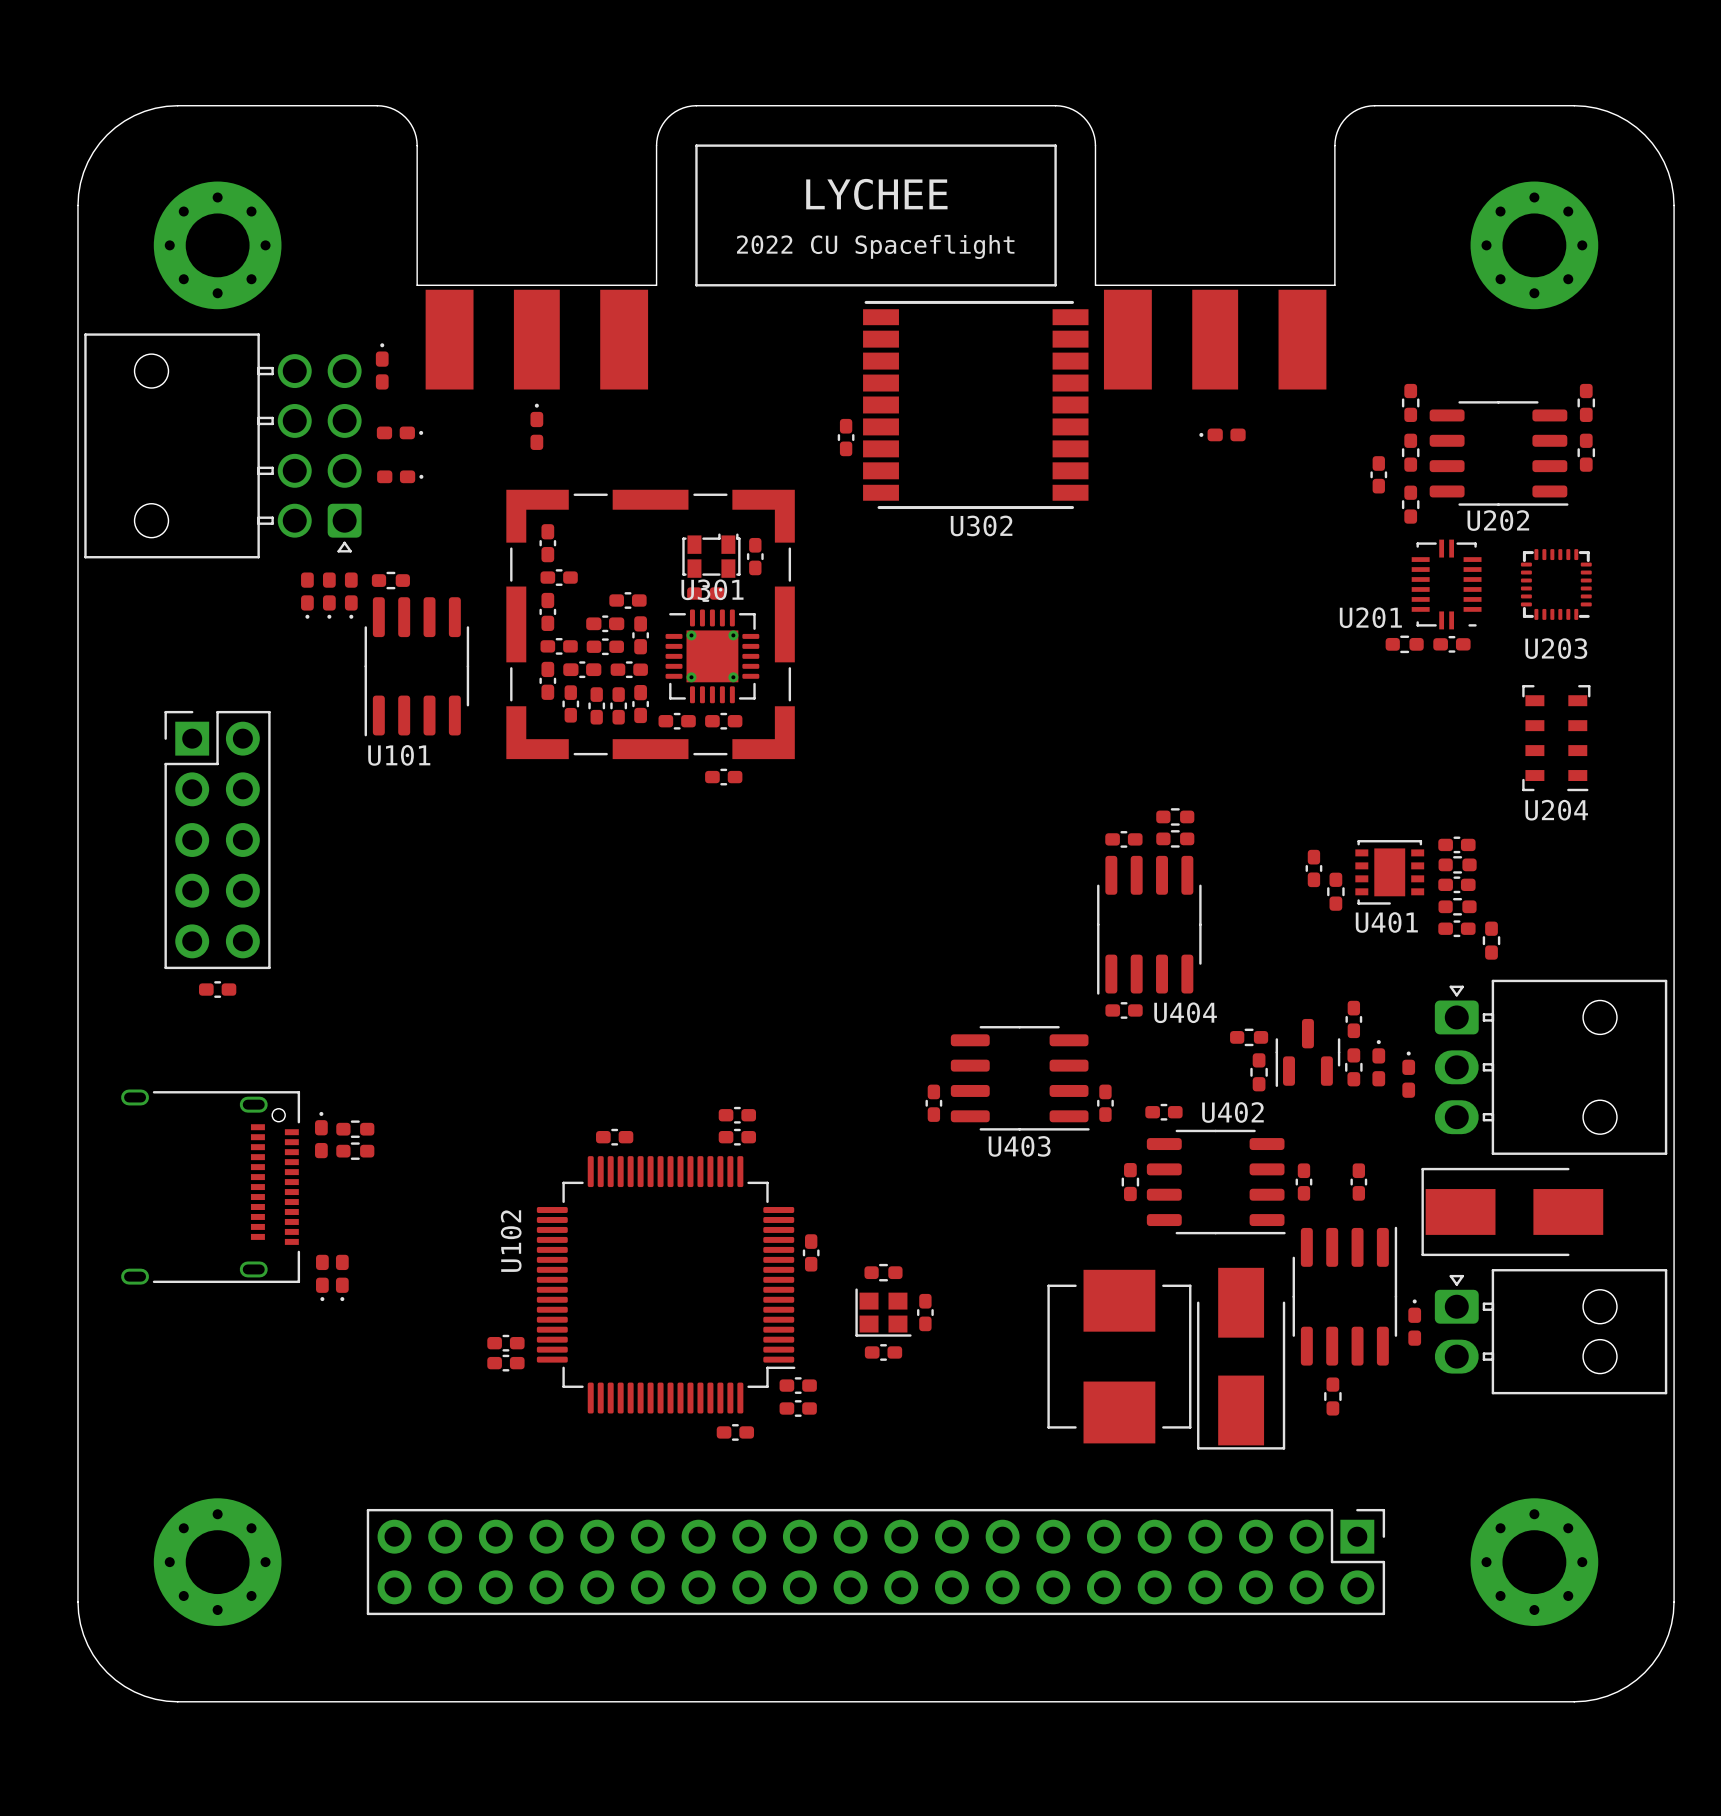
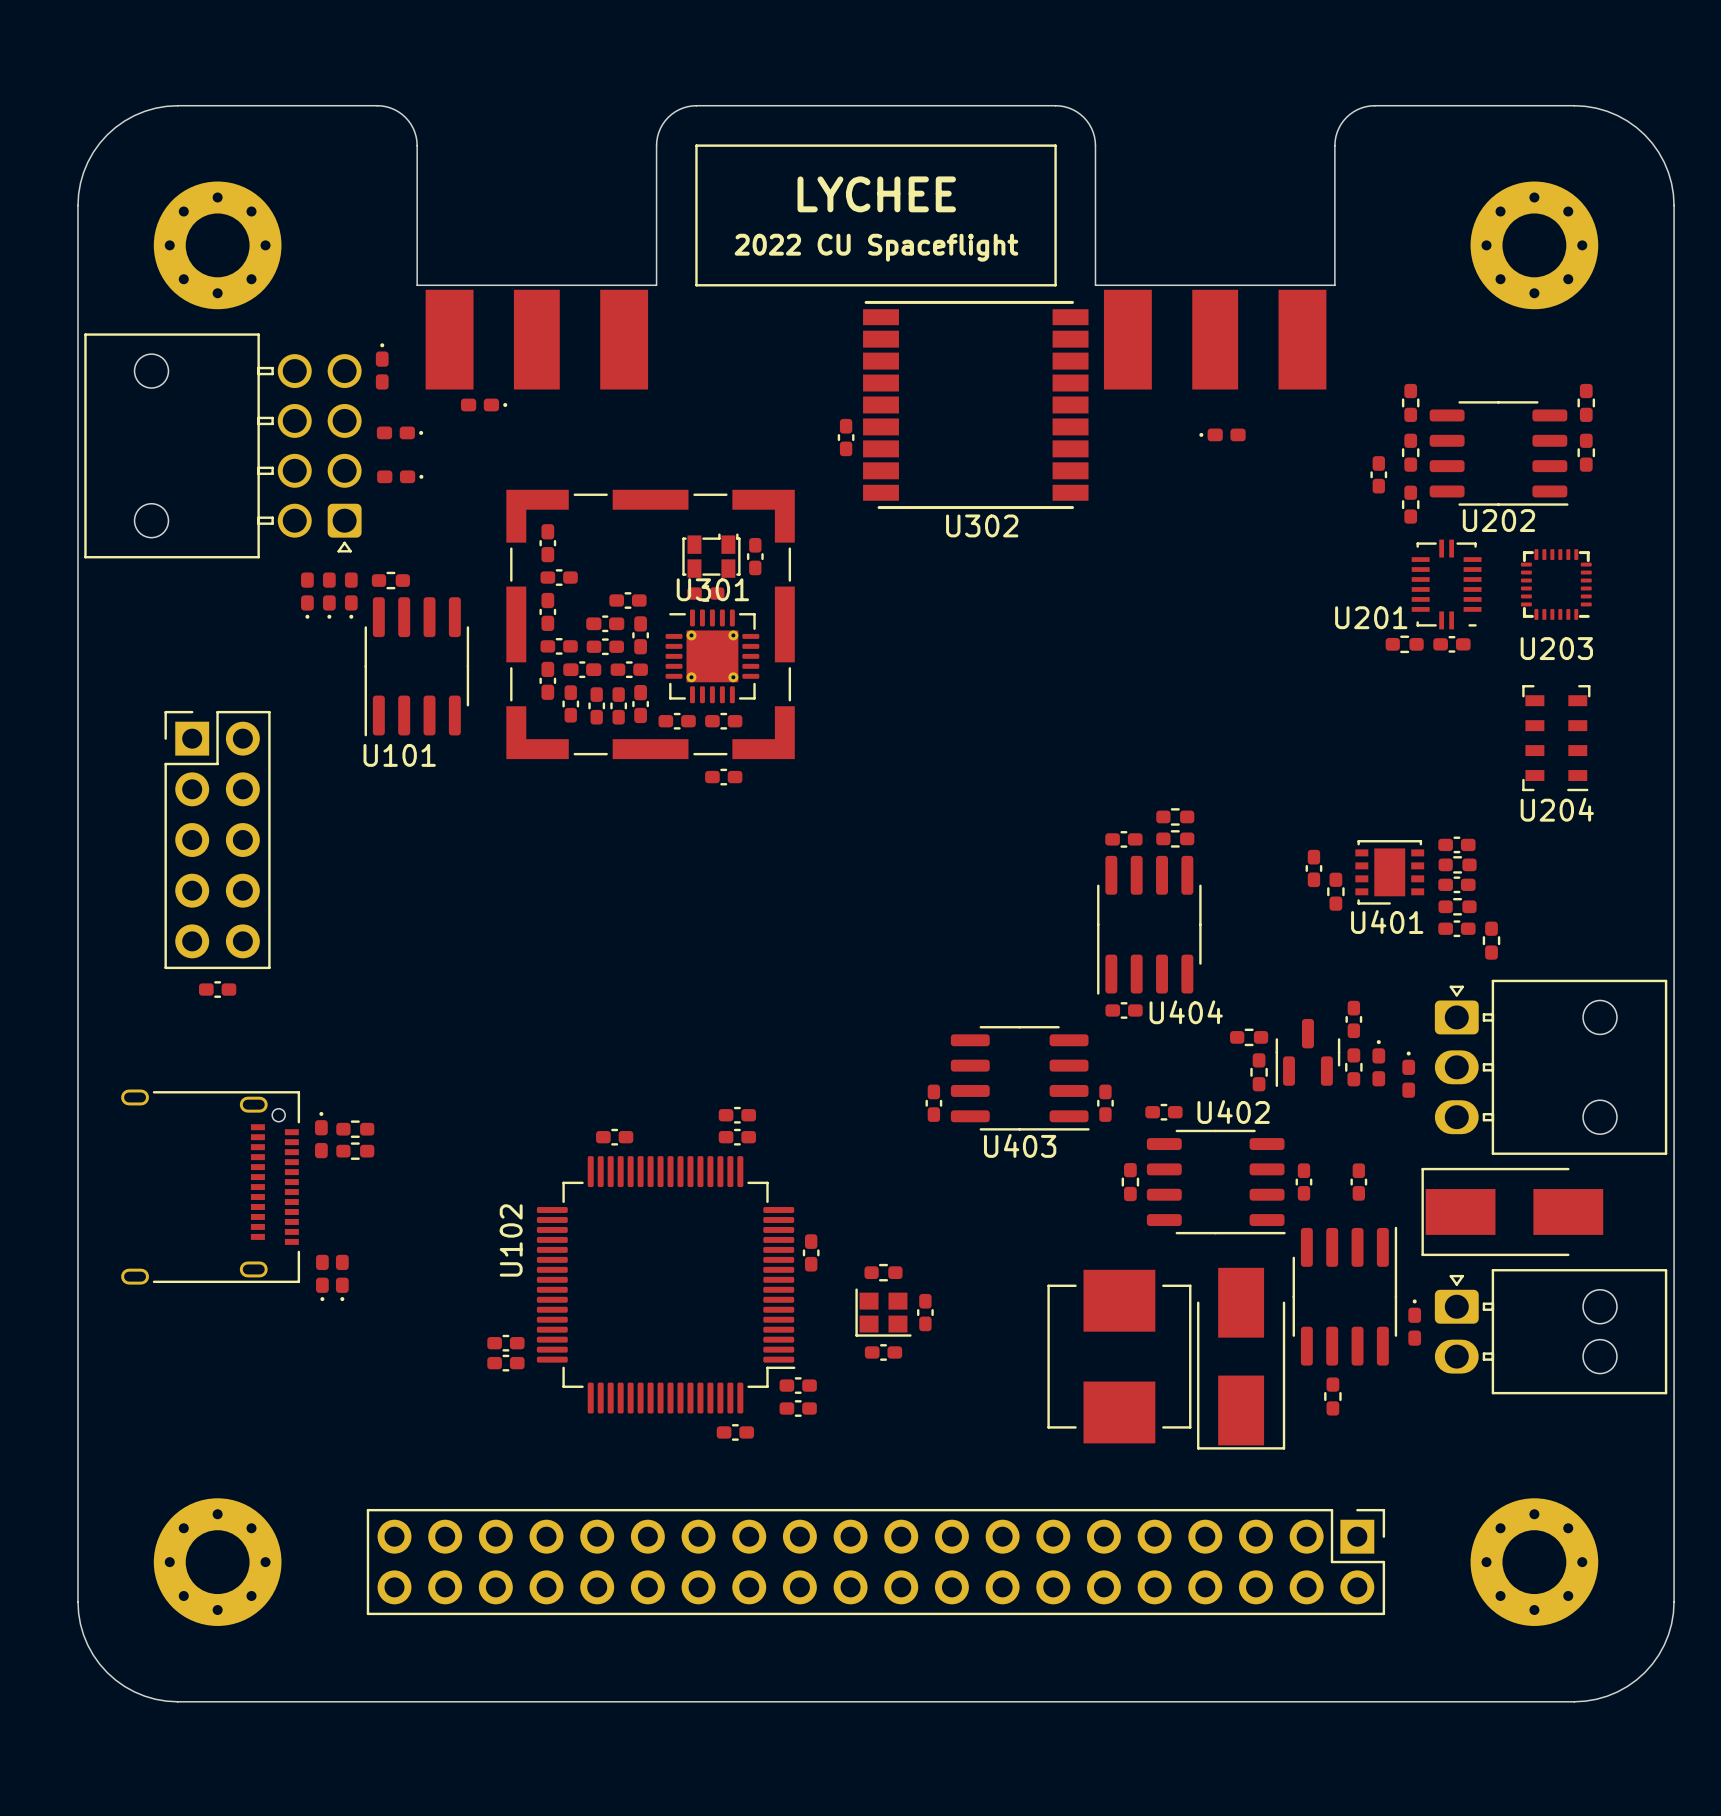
part rotation: 0° (536, 426) -> 90° clockwise (484, 404)
part position: (536, 426) -> (484, 404)

